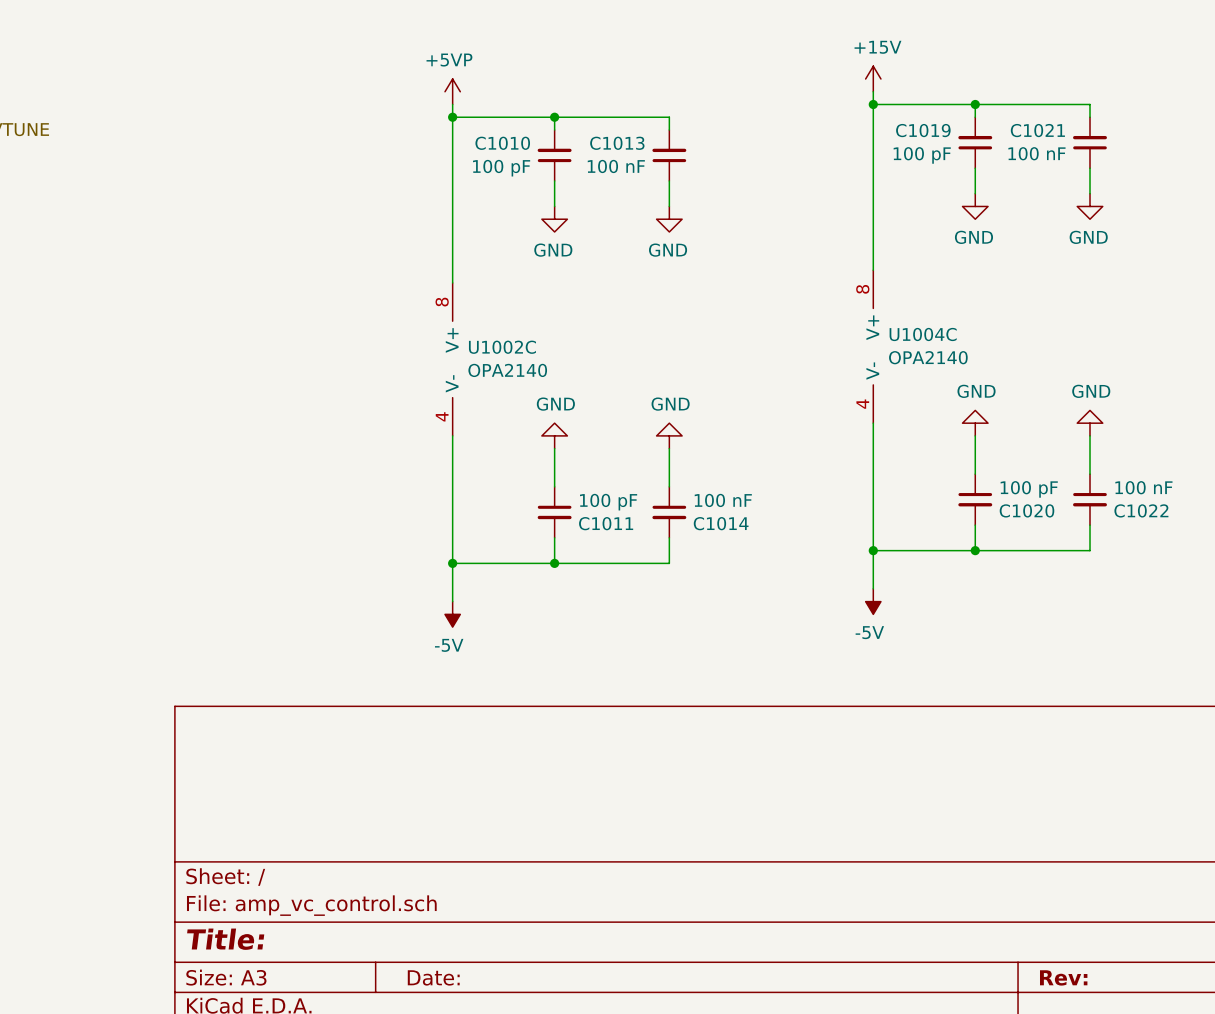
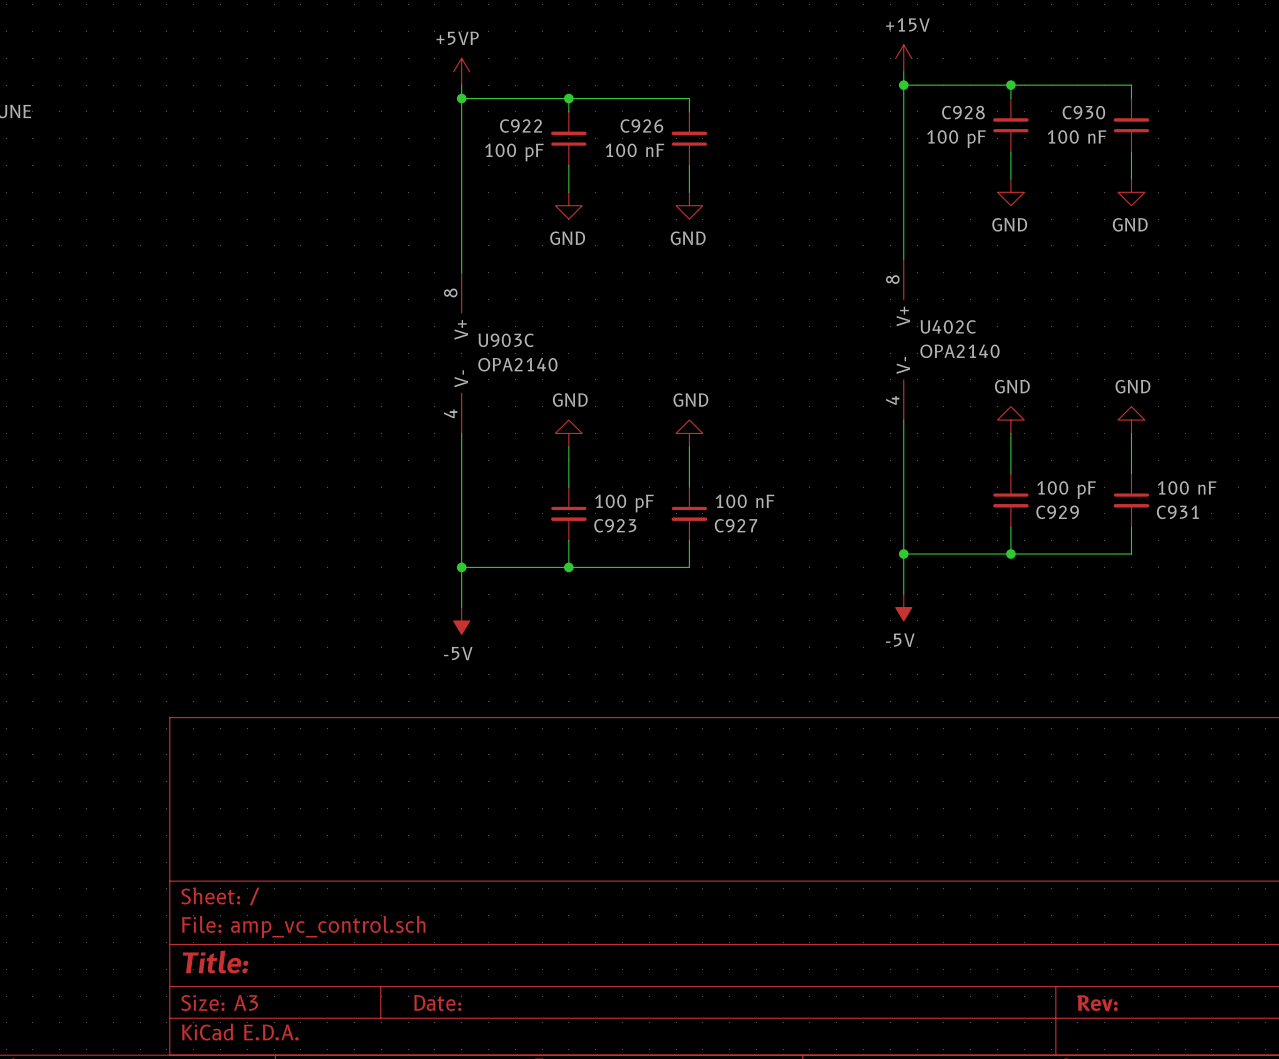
C1019 name: C1019 (923, 130) -> C928 (963, 112)
C1021 name: C1021 (1037, 130) -> C930 (1083, 112)
C1010 name: C1010 (502, 143) -> C922 (521, 125)
C1013 name: C1013 (617, 143) -> C926 (641, 125)
U1004C name: U1004C (923, 334) -> U402C (948, 326)
U1002C name: U1002C (502, 347) -> U903C (506, 340)
C1020 name: C1020 (1026, 510) -> C929 (1057, 512)
C1022 name: C1022 (1141, 510) -> C931 (1177, 512)
C1011 name: C1011 (606, 523) -> C923 (615, 525)
C1014 name: C1014 (721, 523) -> C927 (736, 525)

